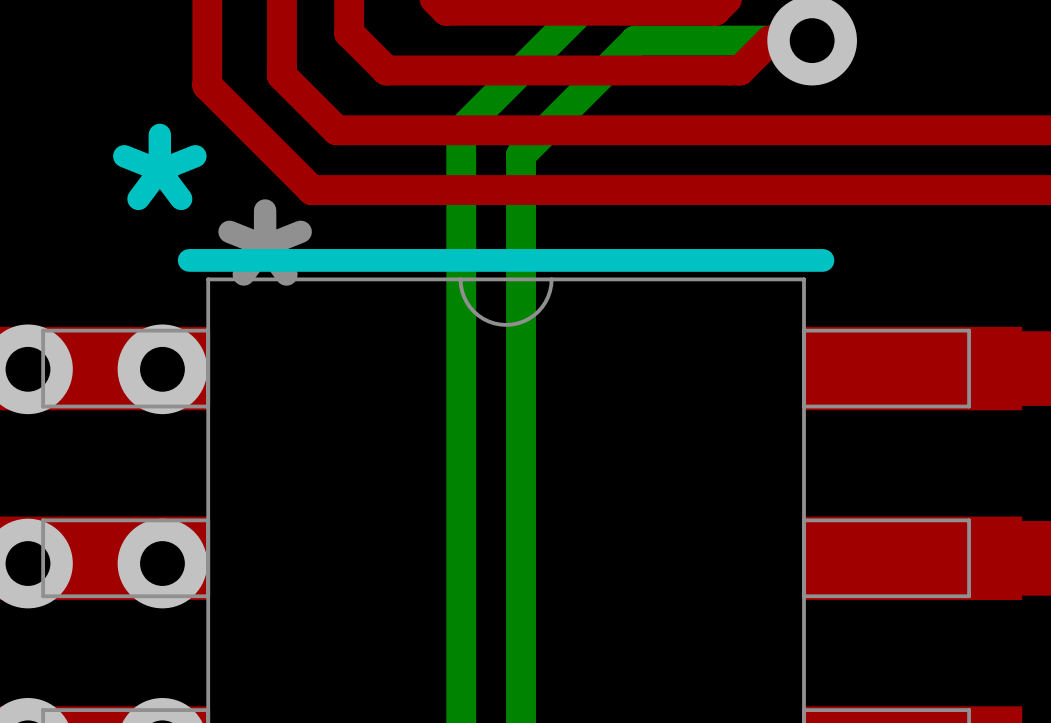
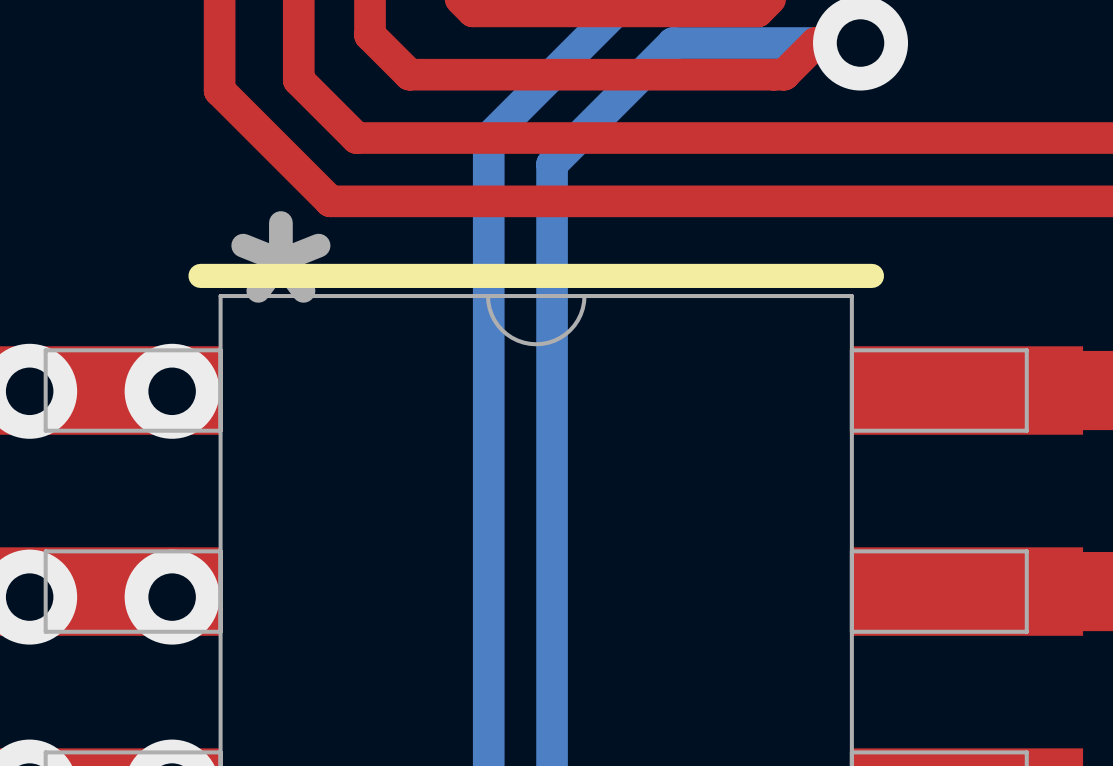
part text: * (159, 166) -> none

